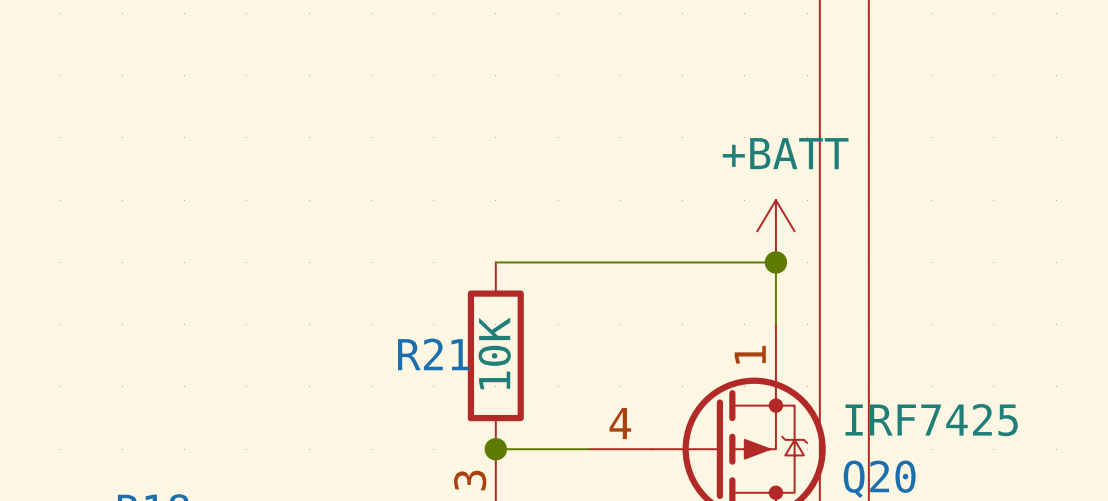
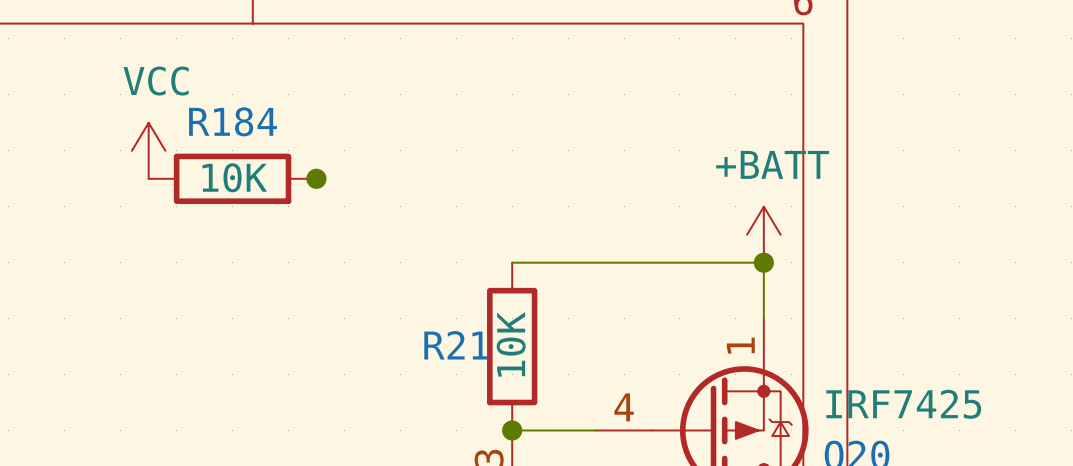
power symbol: none -> VCC (148, 150)
R184: none -> 10K (232, 178)
junction: none -> (316, 178)

